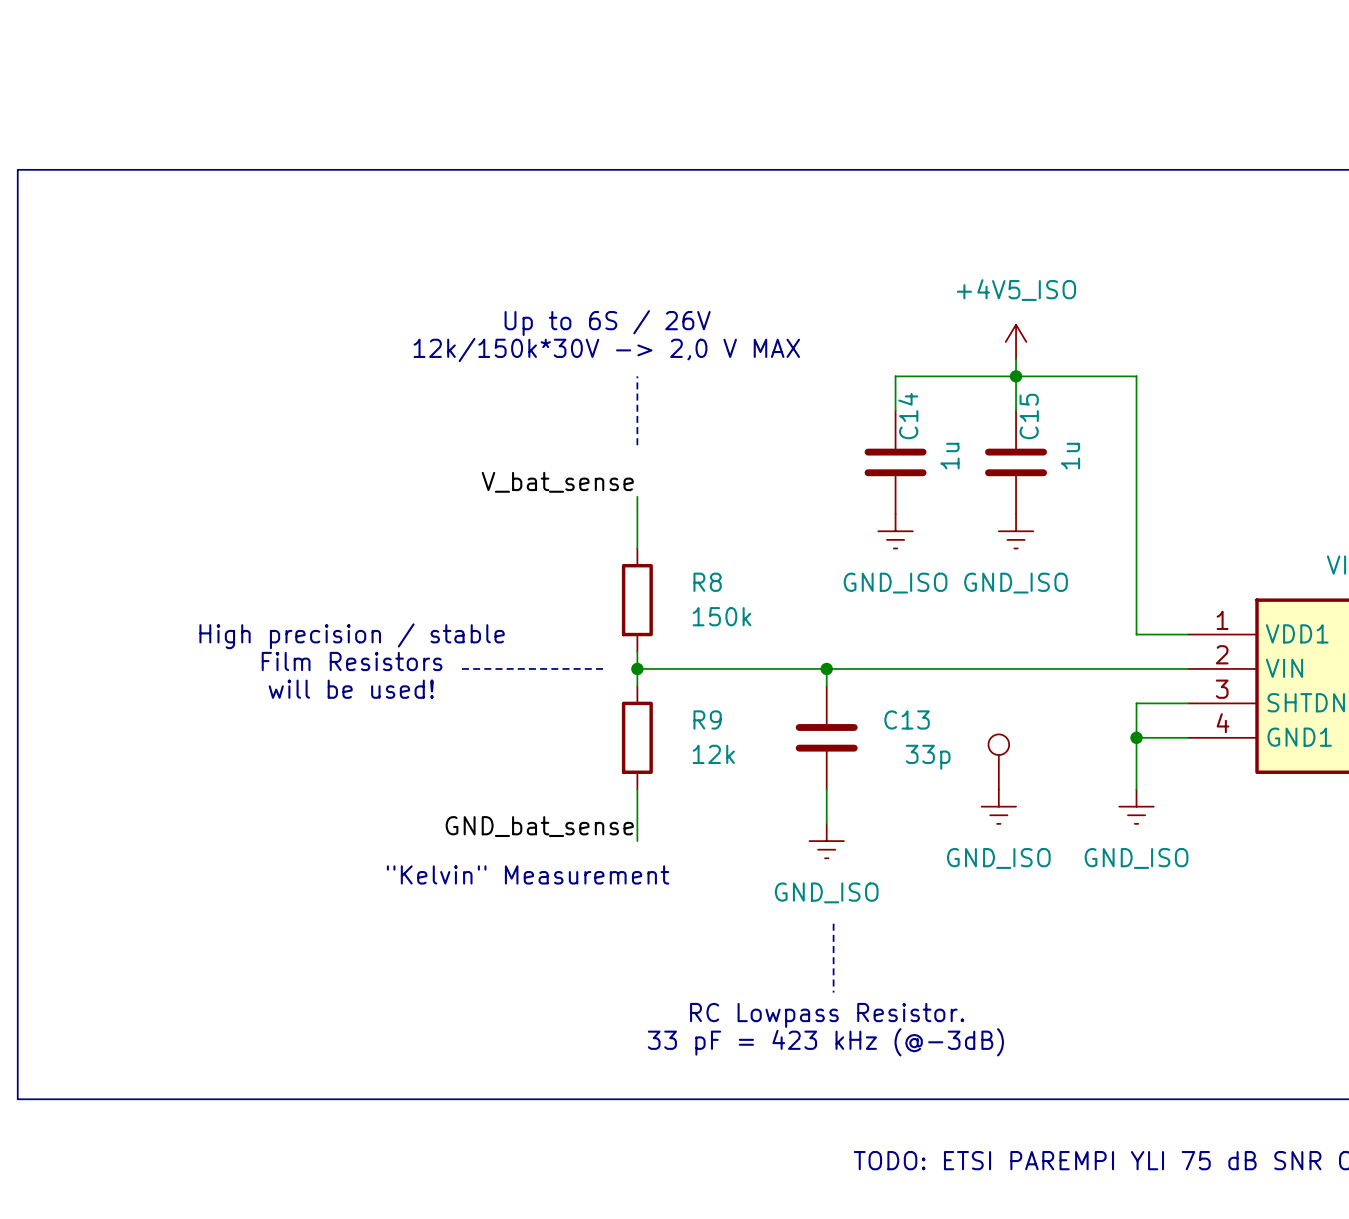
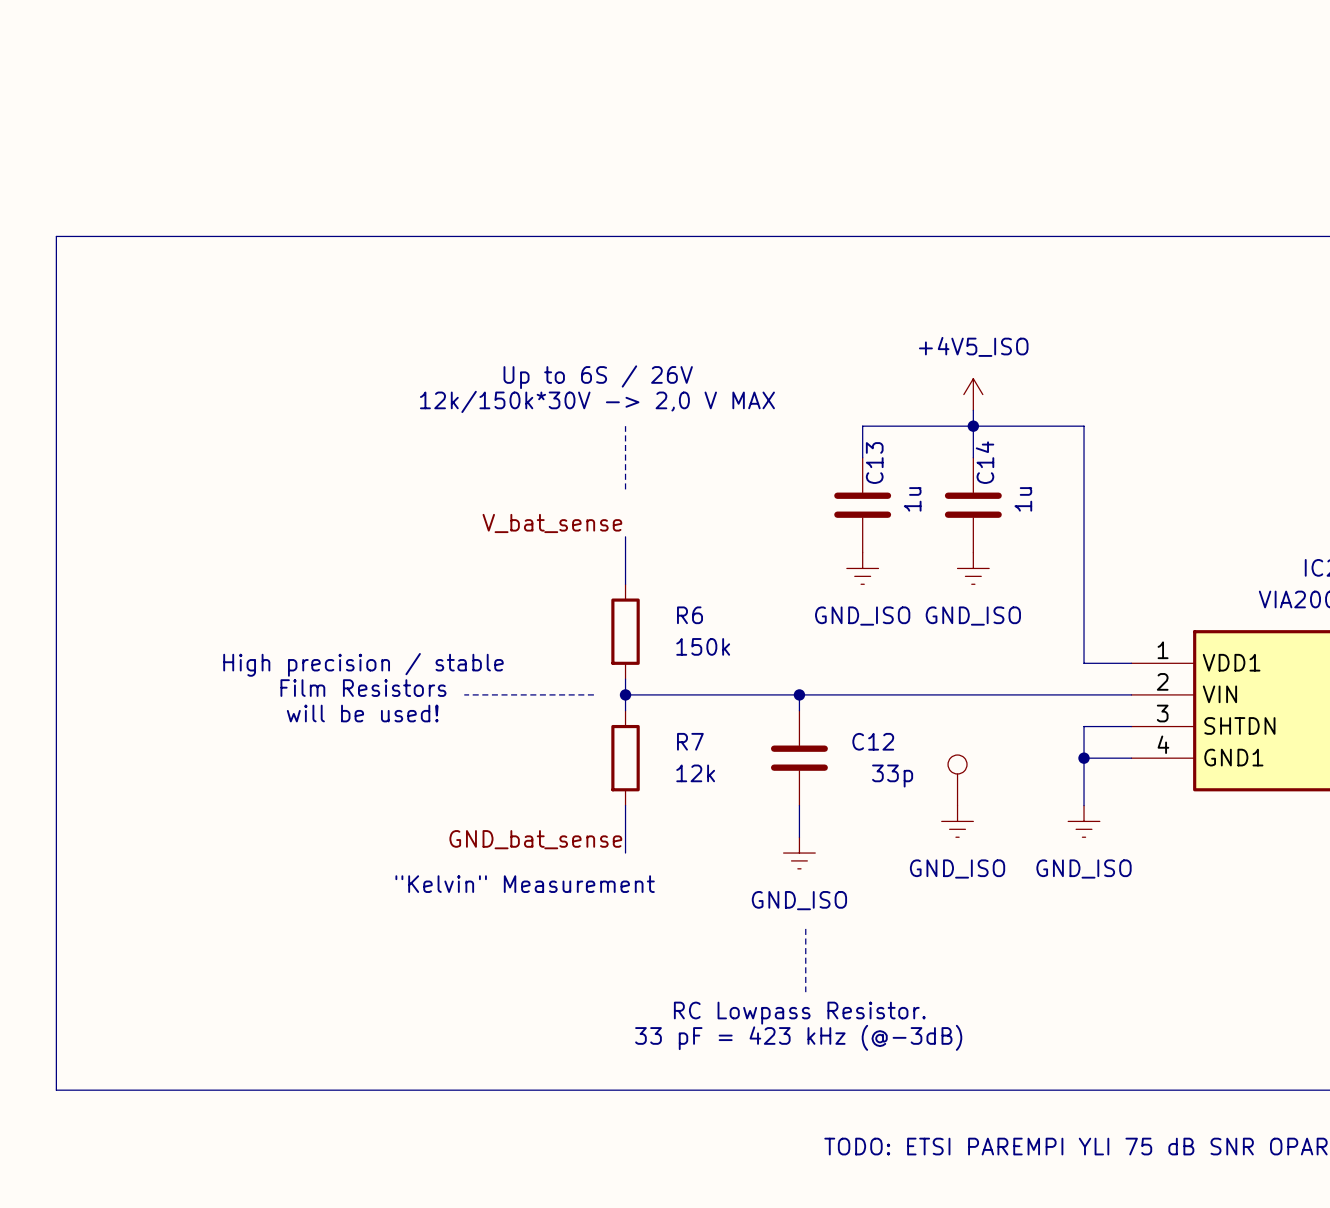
C14 name: C14 (908, 416) -> C13 (874, 463)
C15 name: C15 (1029, 416) -> C14 (985, 462)
R8 name: R8 (707, 582) -> R6 (690, 615)
R9 name: R9 (707, 719) -> R7 (690, 741)
C13 name: C13 (907, 719) -> C12 (873, 741)

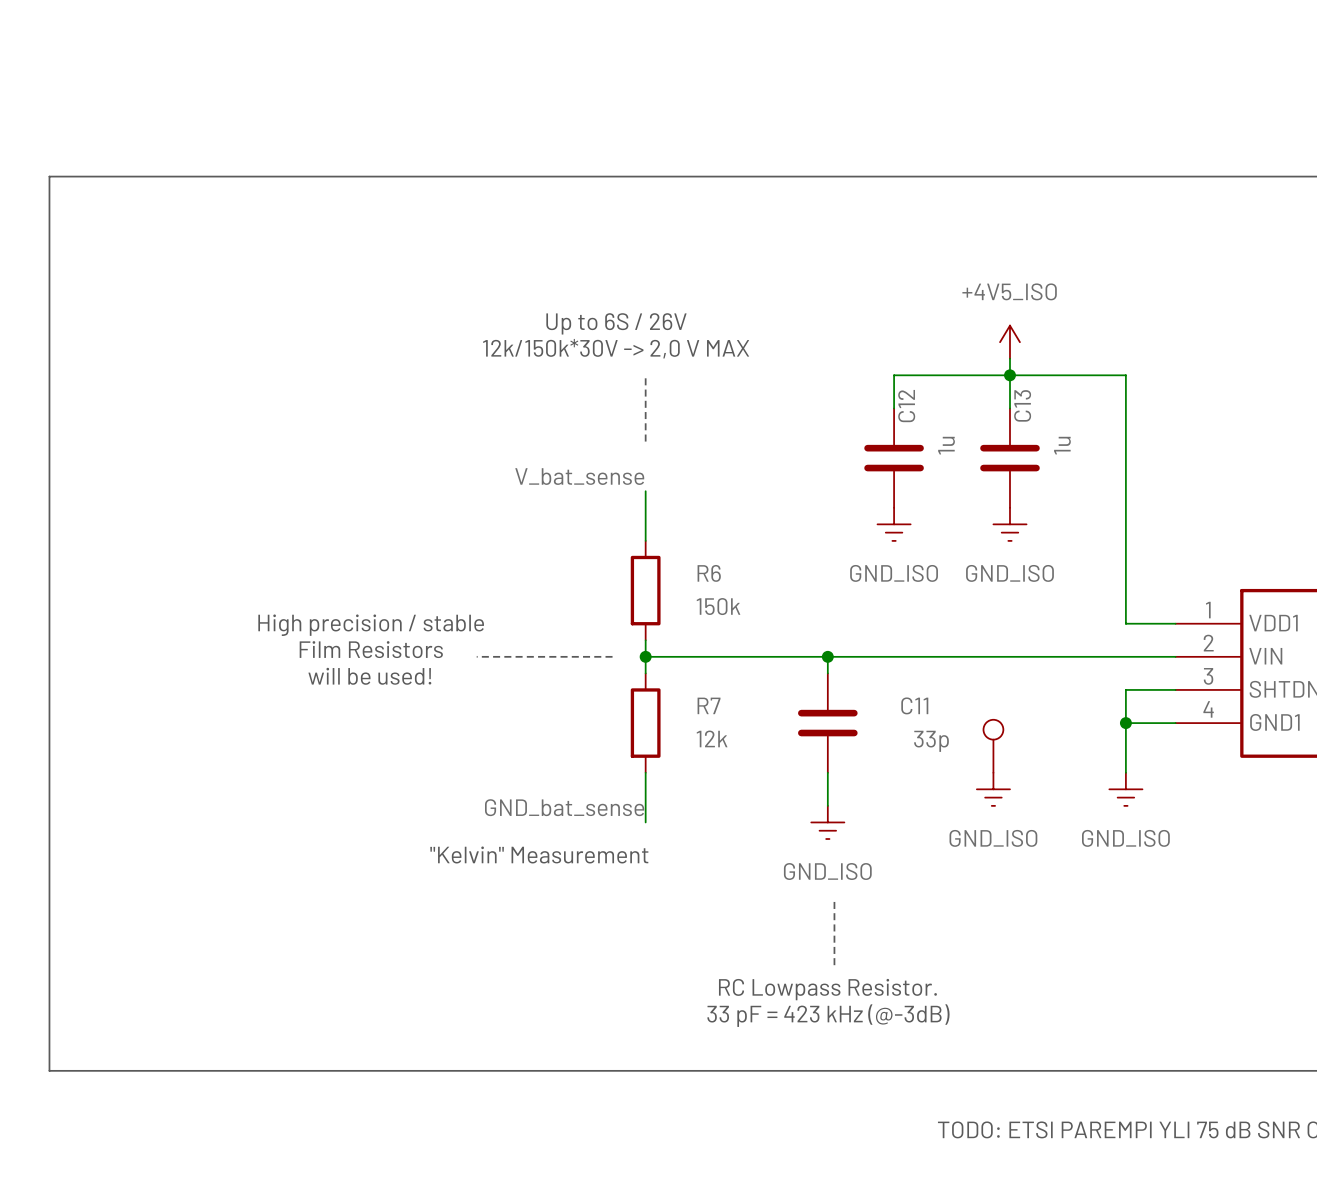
C14 name: C14 (985, 462) -> C13 (1022, 405)
C13 name: C13 (874, 463) -> C12 (906, 406)
C12 name: C12 (873, 741) -> C11 (914, 705)

